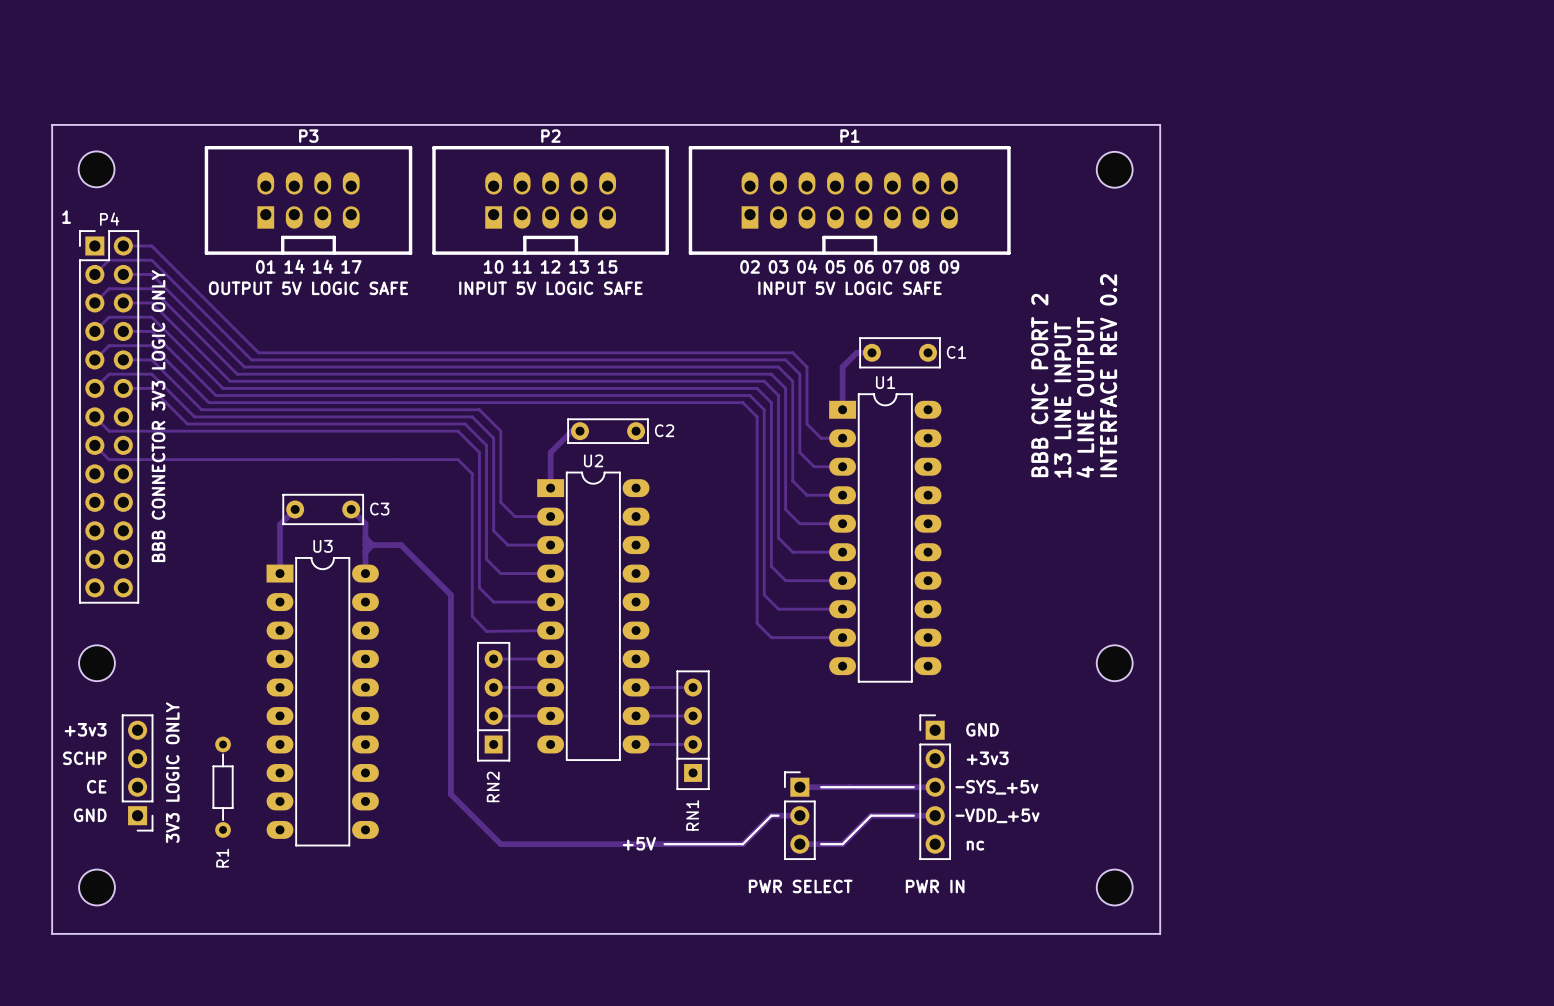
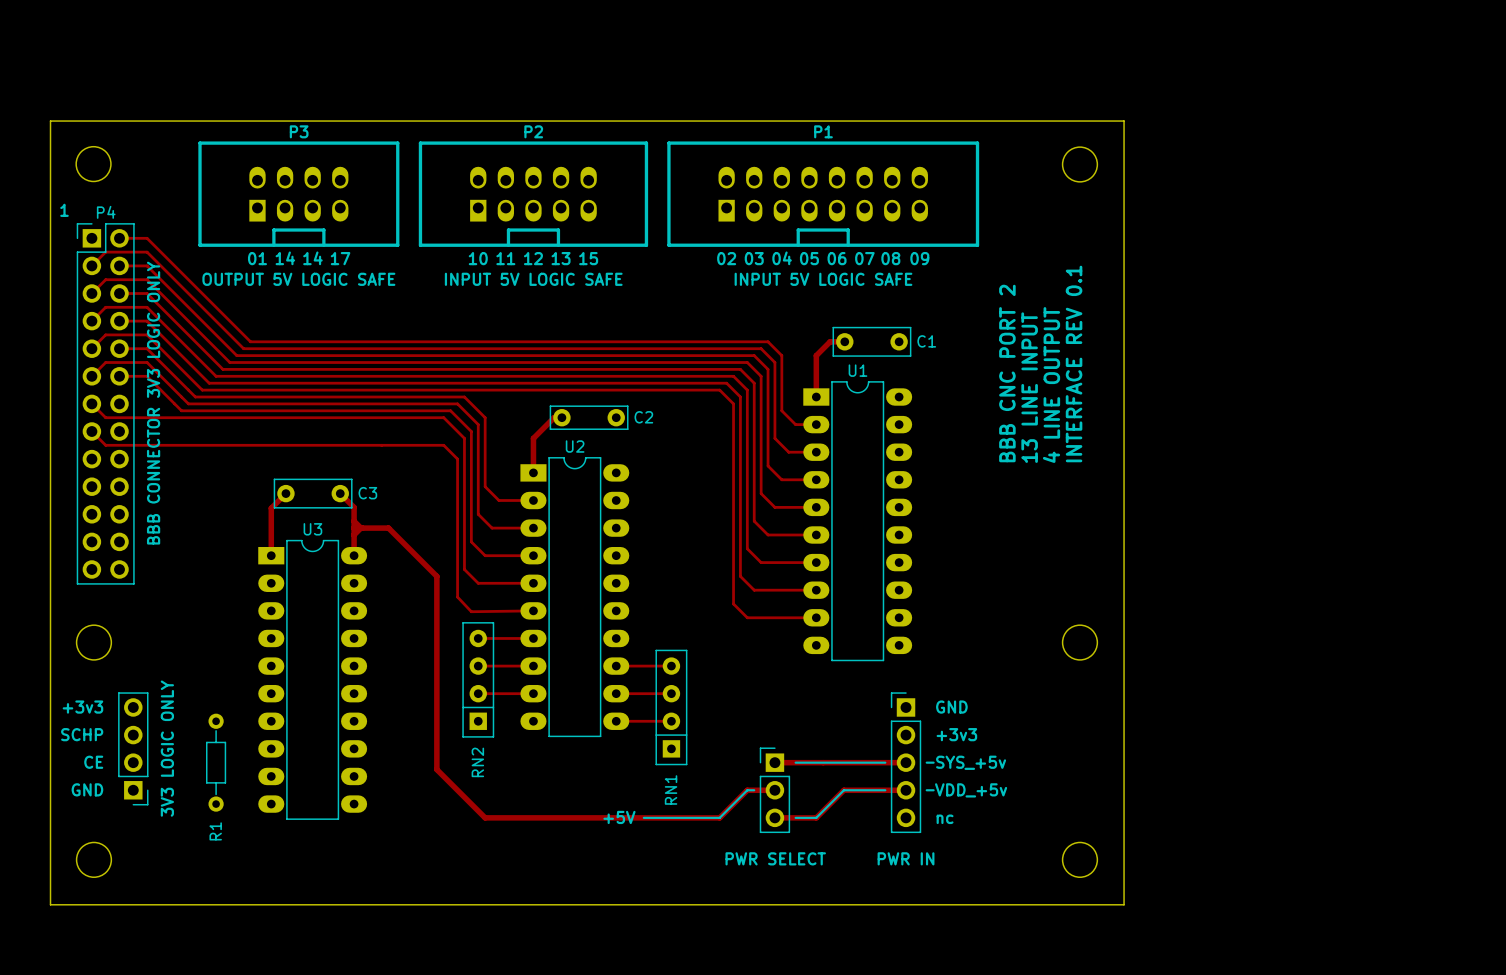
text: INTERFACE REV 0.2 (1108, 375) -> INTERFACE REV 0.1 (1074, 363)

